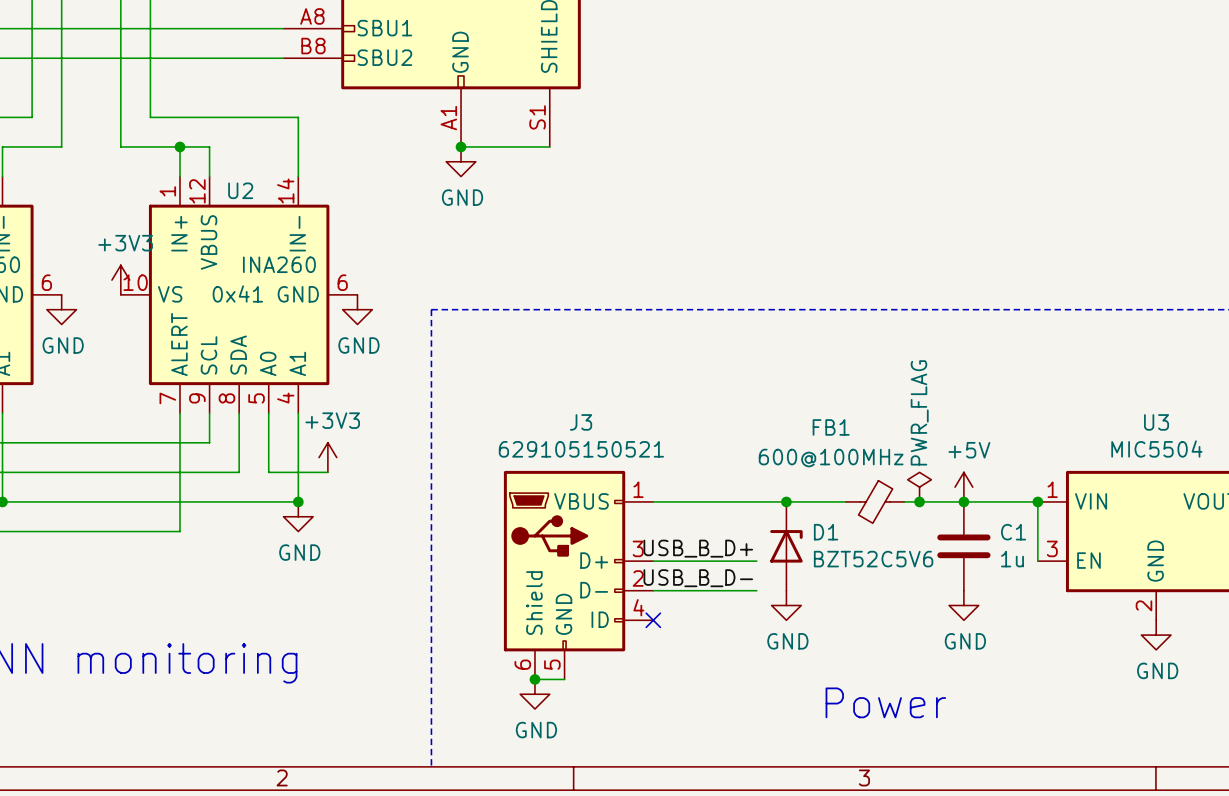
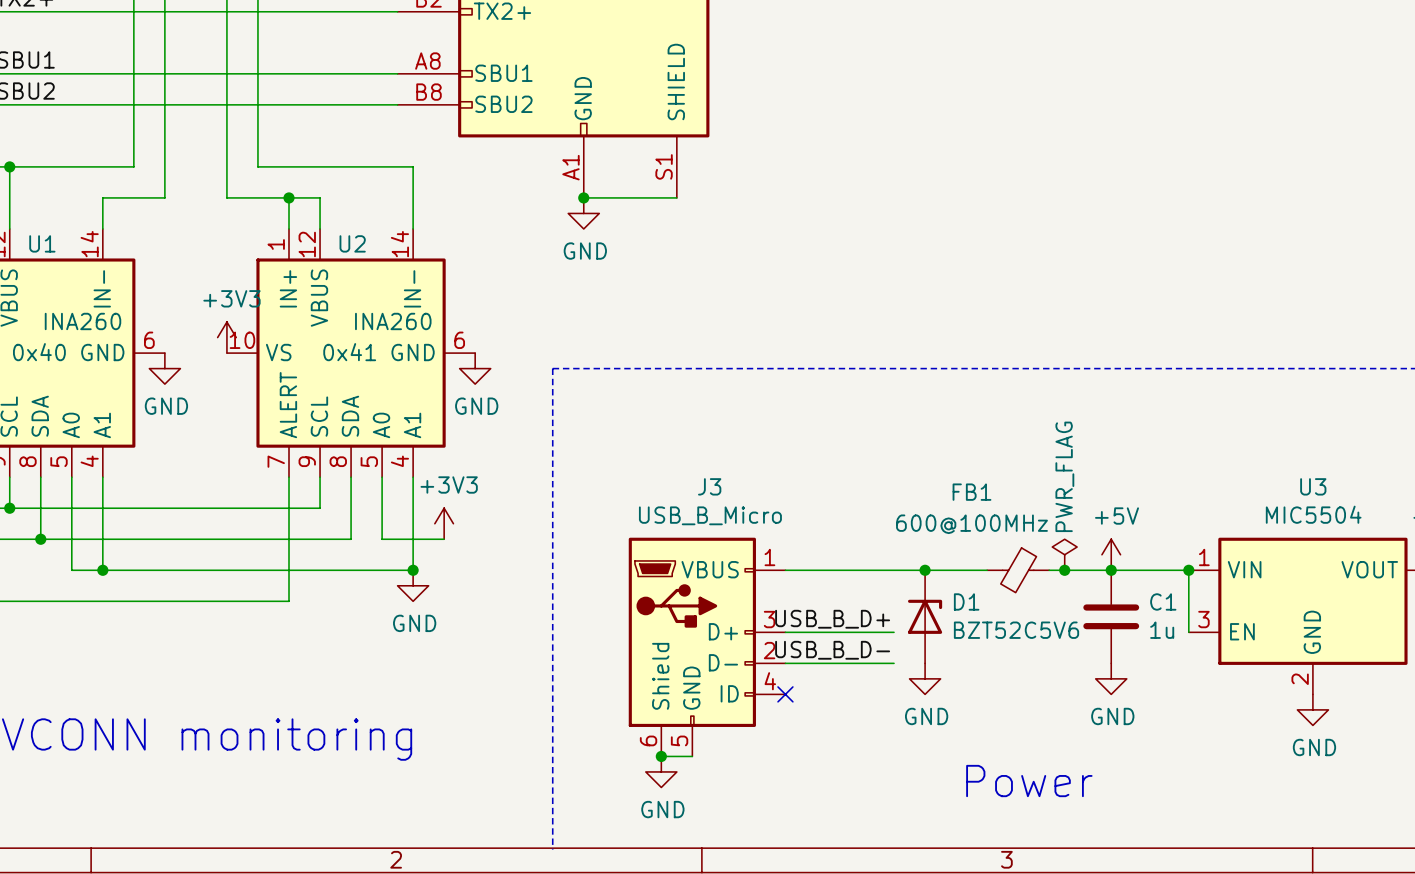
J3 value: 629105150521 (581, 449) -> USB_B_Micro (710, 515)

